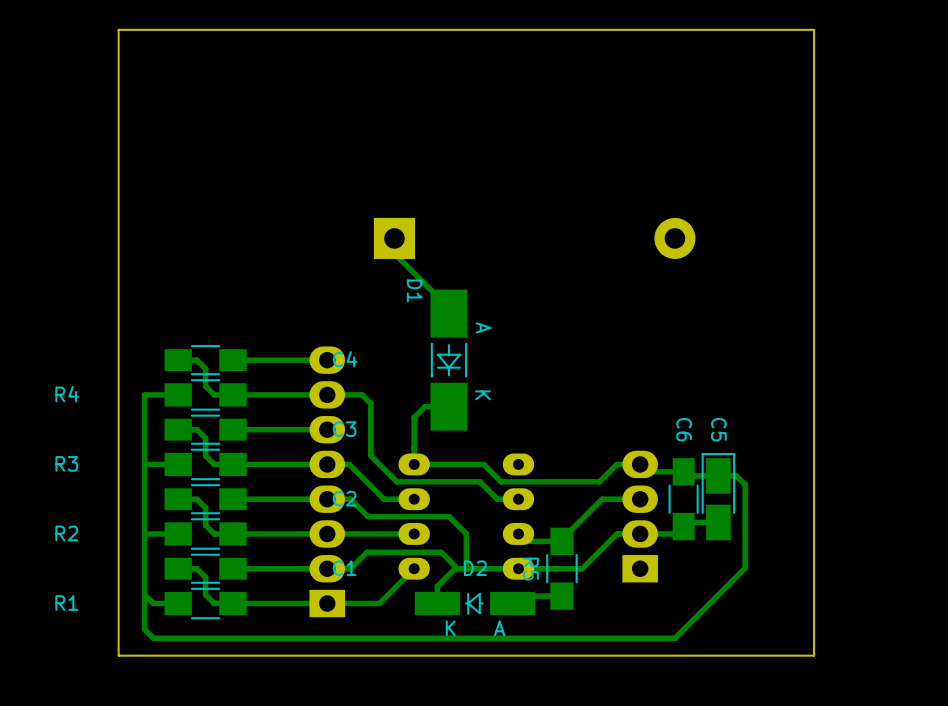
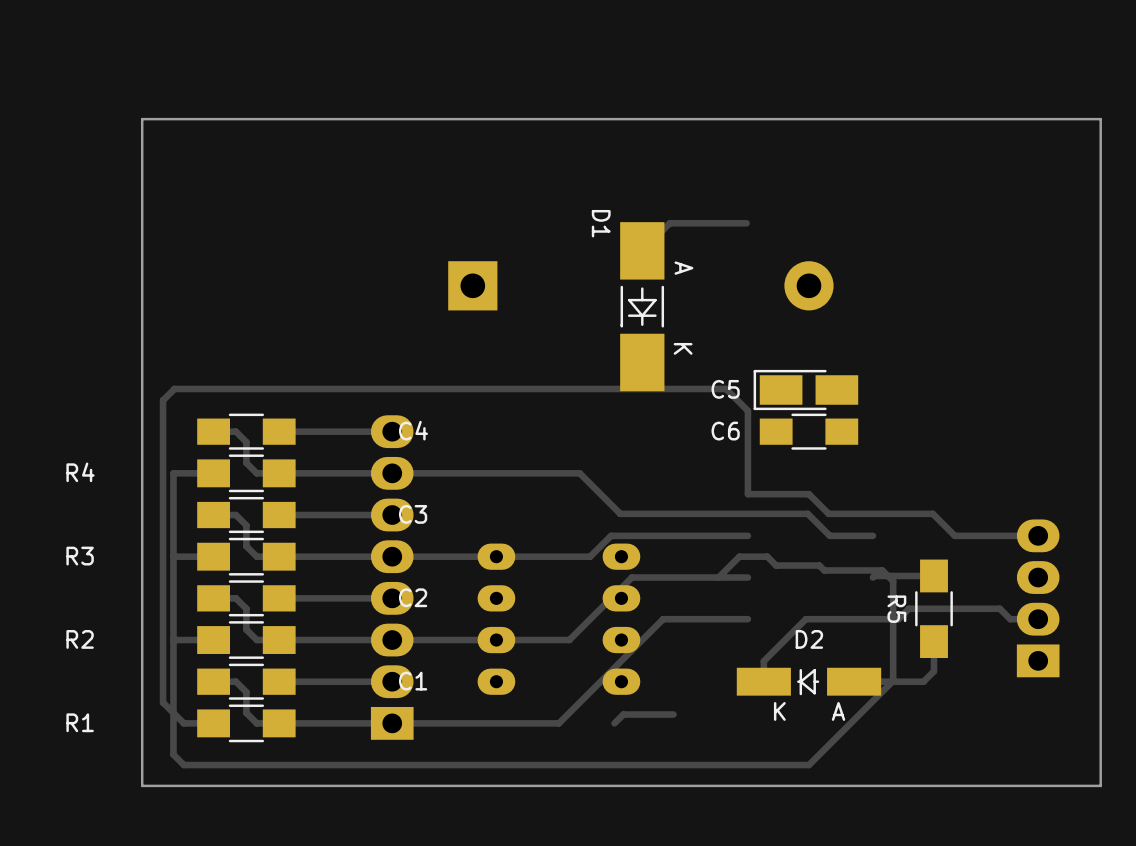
board edge: (118, 99) (118, 29) (814, 29) (814, 655) -> (142, 119) (1100, 119) (1100, 785) (975, 785)
track: none -> (746, 223) (669, 223) (642, 250)
track: (394, 238) (394, 253) (448, 308) (448, 313) -> none
D1 position: (448, 360) -> (642, 306)
track: (362, 394) (370, 403) (370, 455) (396, 481) (479, 481) (497, 499) (518, 499) -> (433, 473) (579, 473) (620, 513) (807, 513) (829, 535) (872, 535)
track: (448, 412) (448, 406) (424, 406) (414, 417) (414, 464) -> none
C6 name position: C6 (684, 429) -> C6 (725, 431)
track: none -> (747, 535) (611, 535) (590, 556) (579, 556)
track: none -> (1038, 535) (954, 535) (932, 513) (828, 513) (808, 494) (747, 494) (747, 410) (726, 388) (174, 388) (163, 400) (163, 702) (173, 712)
track: (349, 464) (384, 499) (414, 499) -> (418, 556) (496, 556)
track: (483, 464) (501, 481) (527, 481) -> (496, 640) (569, 640) (631, 577)
track: none -> (934, 575) (874, 575) (872, 577)
track: none -> (747, 577) (718, 577)
C5 rotation: 0° (718, 496) -> 90° counterclockwise (805, 390)
C5 position: (718, 496) -> (805, 390)
track: (327, 499) (350, 499) (367, 516) (448, 516) (466, 533) (466, 568) -> none
track: (640, 499) (602, 499) (561, 541) (525, 541) (518, 533) -> none
C6 rotation: 0° (683, 499) -> 90° clockwise (808, 431)
C6 position: (683, 499) -> (808, 431)
part position: (640, 516) -> (1038, 598)
track: none -> (1038, 619) (1010, 619) (999, 608) (908, 608) (898, 619) (805, 619) (763, 661) (763, 681)
track: (718, 522) (687, 522) (676, 533) (616, 533) (582, 568) (455, 568) (437, 586) (437, 603) -> none
track: none -> (934, 641) (934, 671) (923, 681) (854, 681)
track: (414, 568) (379, 603) -> (747, 619) (663, 619) (558, 723) (454, 723)
track: (457, 568) (441, 552) (366, 552) (350, 568) (327, 568) -> none
R5 position: (561, 568) -> (934, 608)
D2 position: (475, 603) -> (808, 681)

